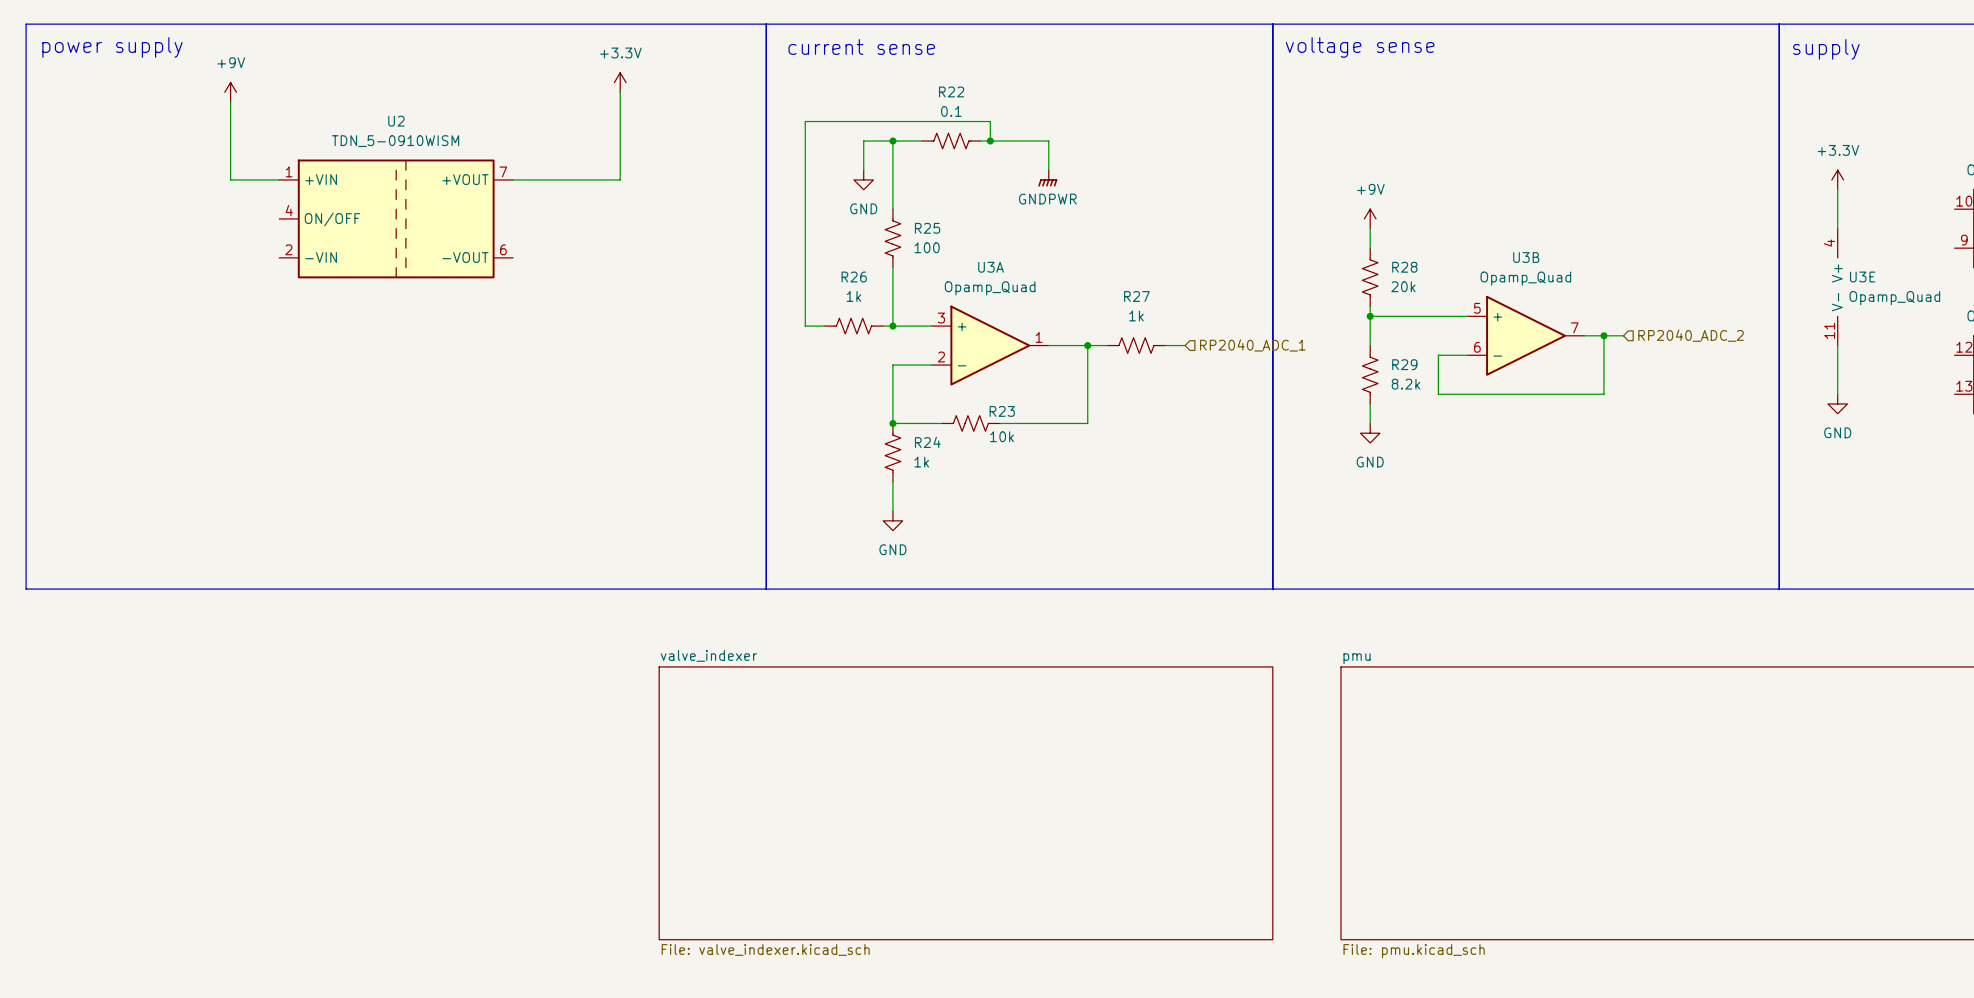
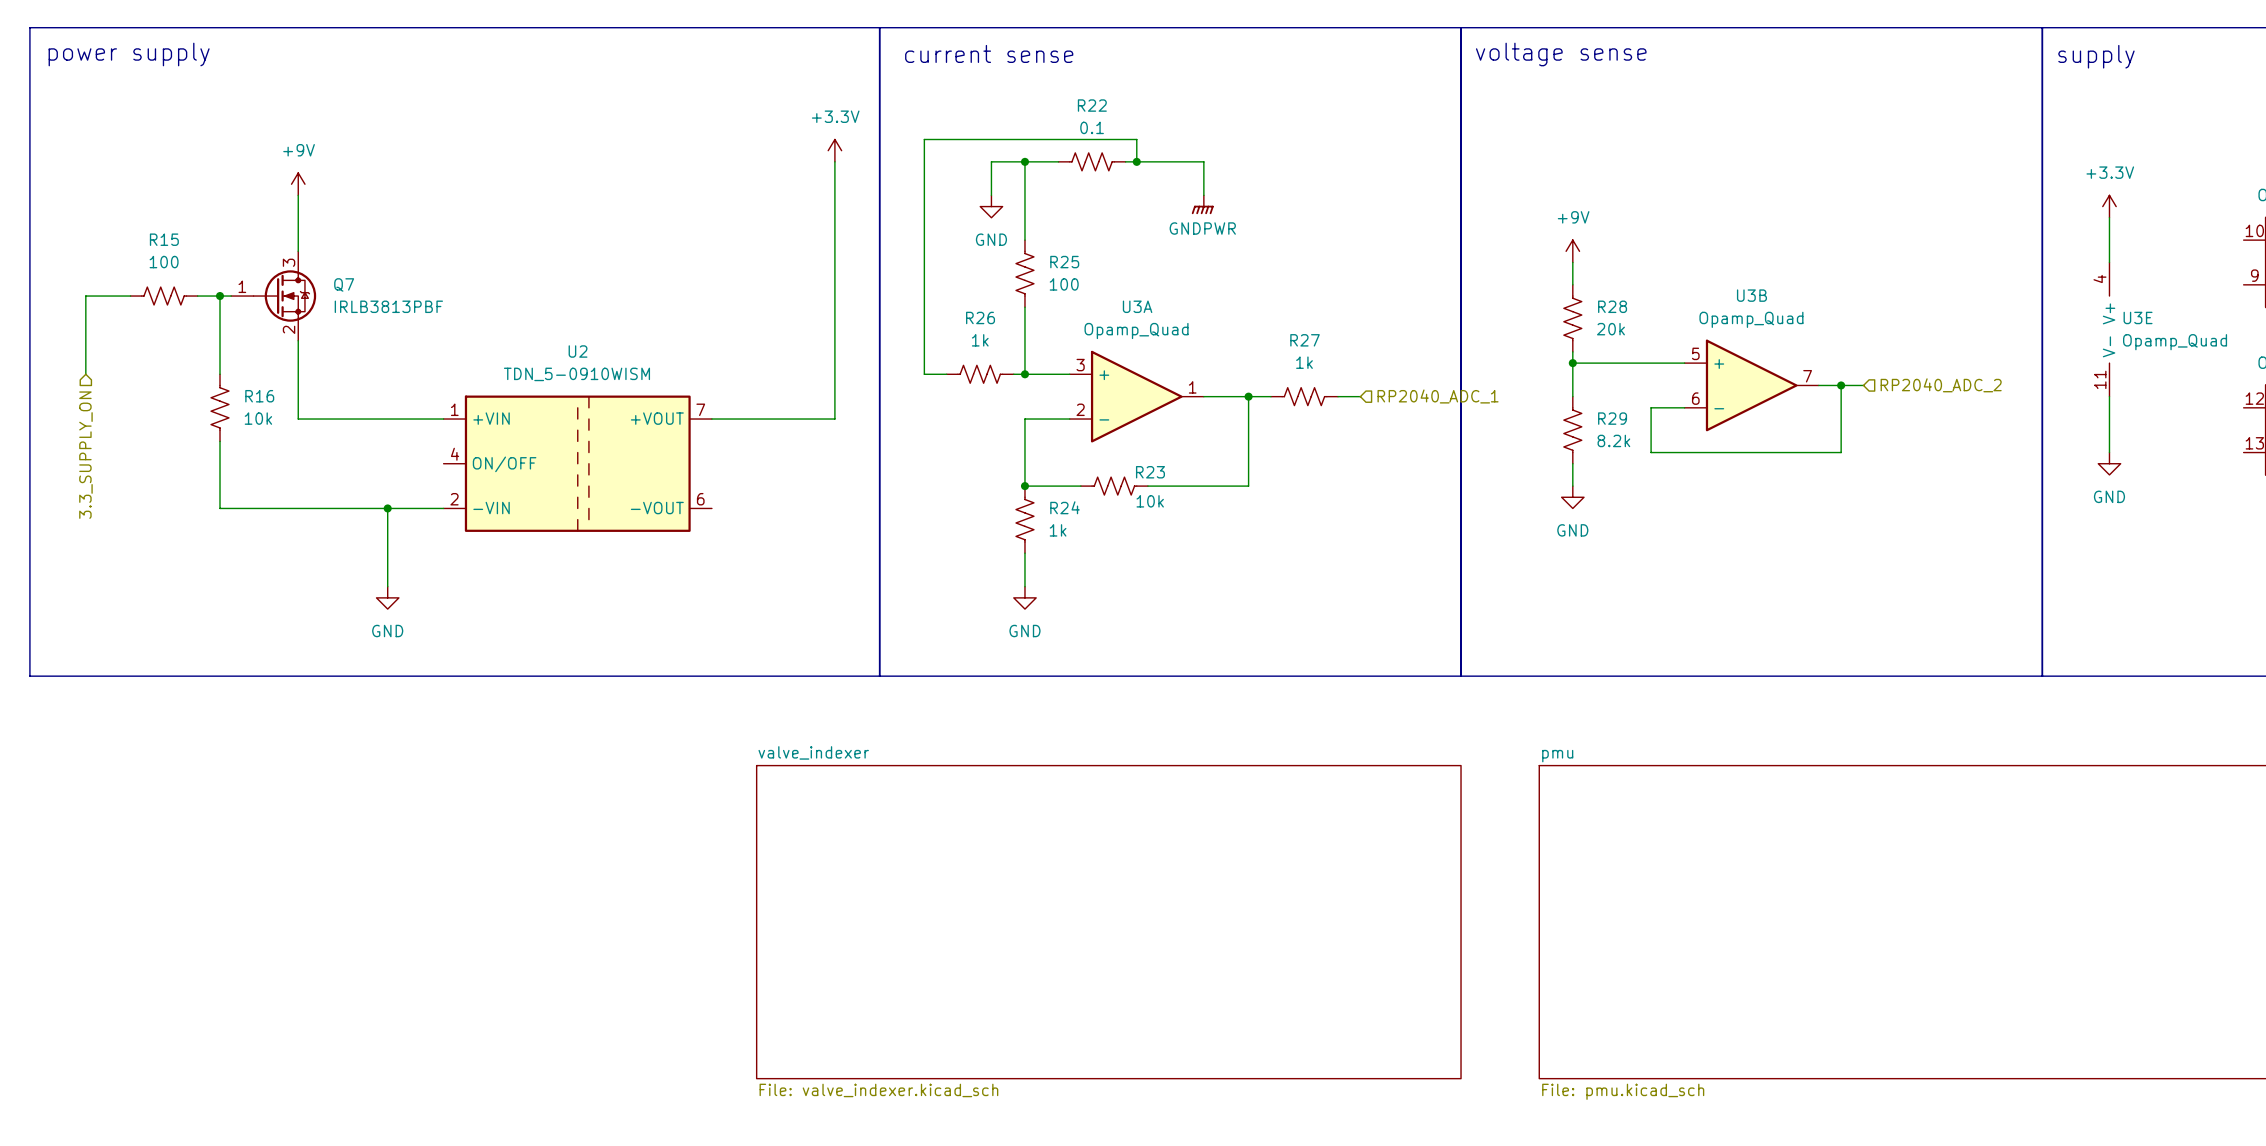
power symbol position: +3.3V (620, 82) -> +3.3V (834, 150)
power symbol position: +9V (230, 92) -> +9V (298, 184)
wire: (620, 92) (620, 179) (513, 179) -> none
wire: (230, 102) (230, 179) (279, 179) -> none
wire: none -> (834, 161) (834, 419) (711, 419)
wire: none -> (298, 195) (298, 251)
U2 position: (396, 218) -> (577, 463)
wire: none -> (130, 296) (85, 296) (85, 374)
R15: none -> 100 (164, 296)
wire: none -> (197, 296) (231, 296)
wire: none -> (220, 296) (220, 374)
junction: none -> (220, 296)
Q7: none -> IRLB3813PBF (273, 296)
wire: none -> (298, 340) (298, 419) (443, 419)
R16: none -> 10k (220, 407)
wire: none -> (220, 441) (220, 508) (443, 508)
hierarchical label: none -> 3.3_SUPPLY_ON (85, 455)
wire: none -> (387, 508) (387, 586)
junction: none -> (387, 508)
power symbol: none -> GND (387, 597)

